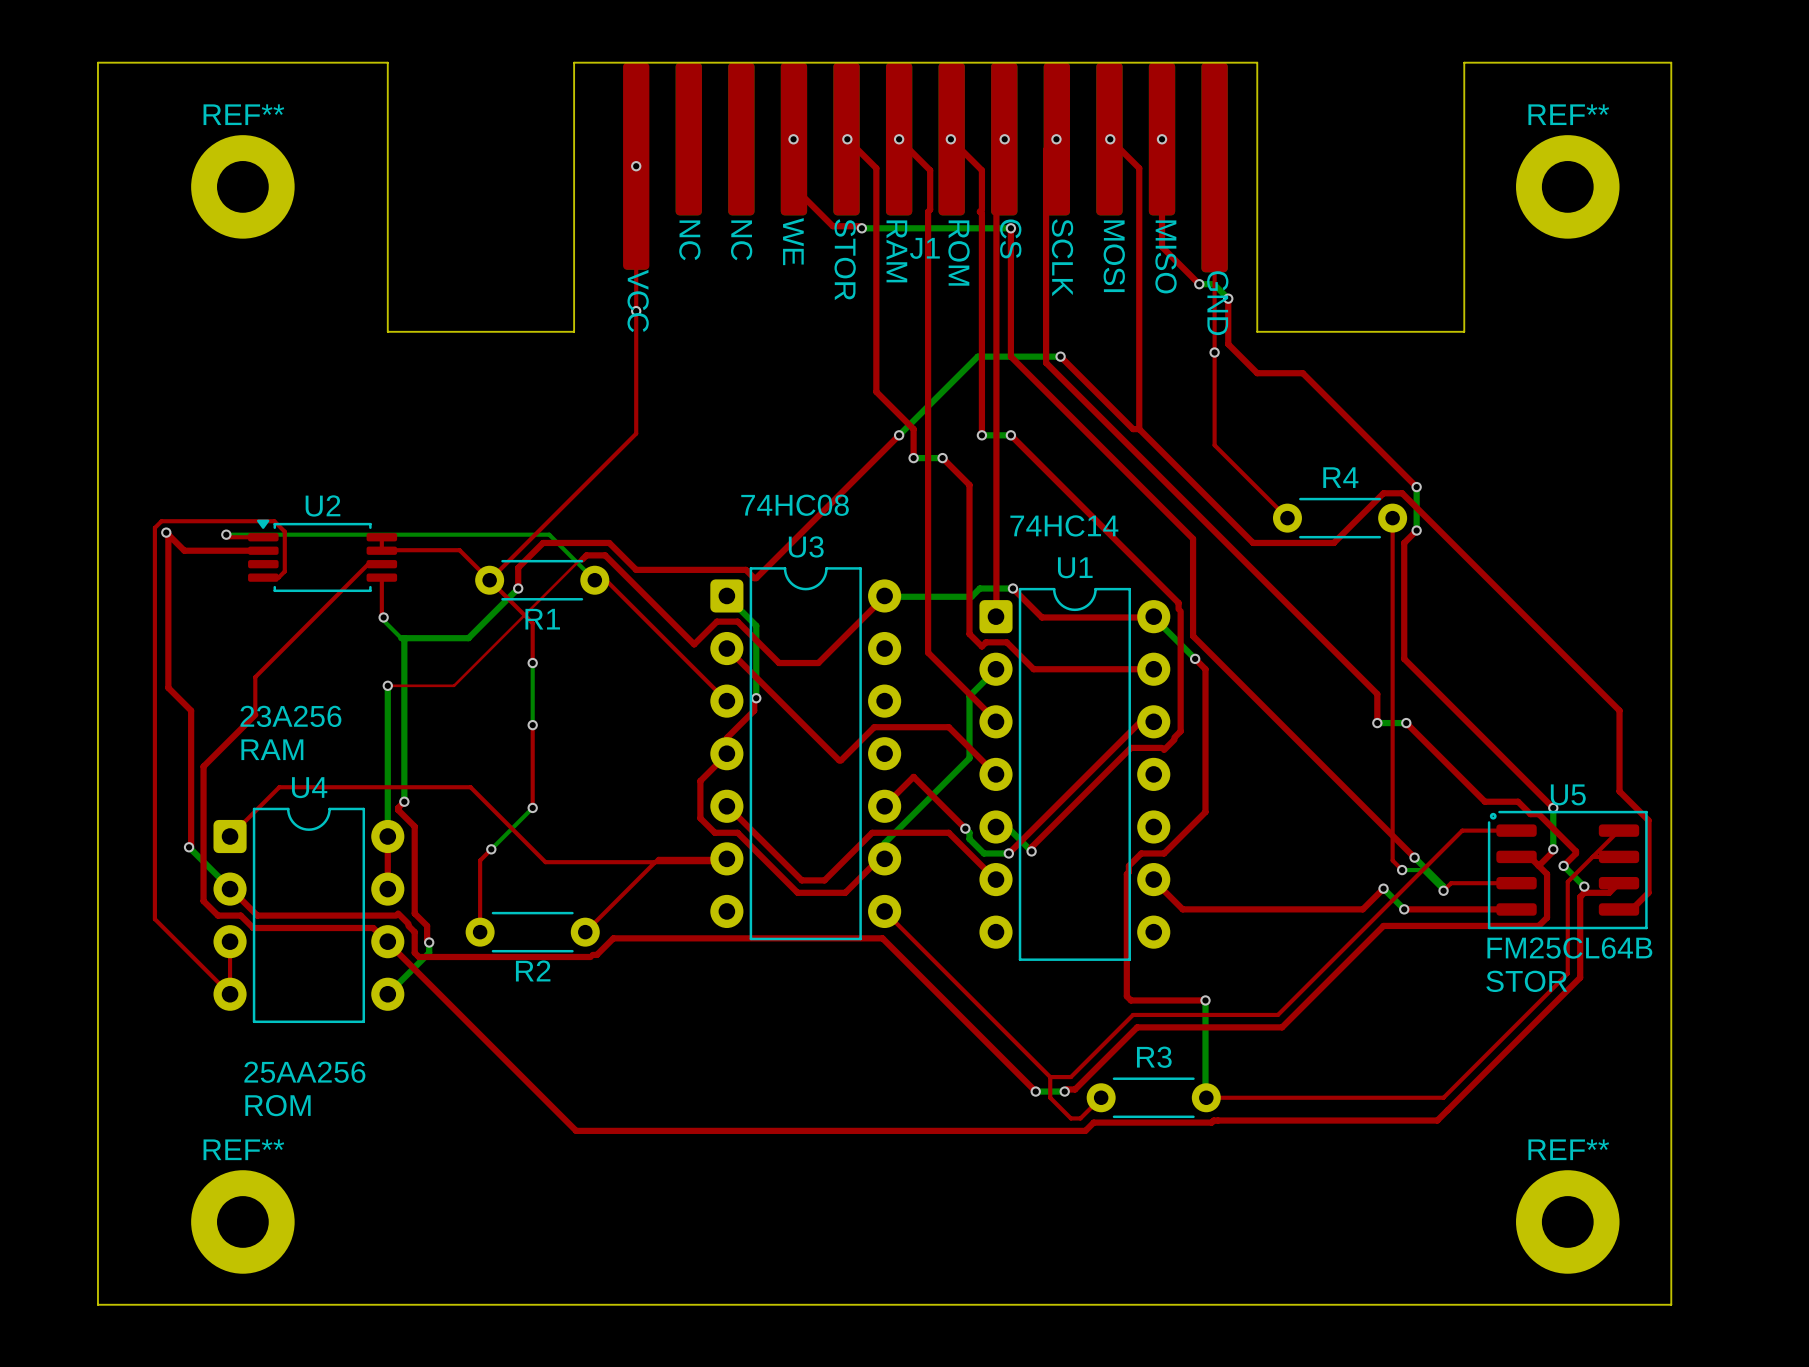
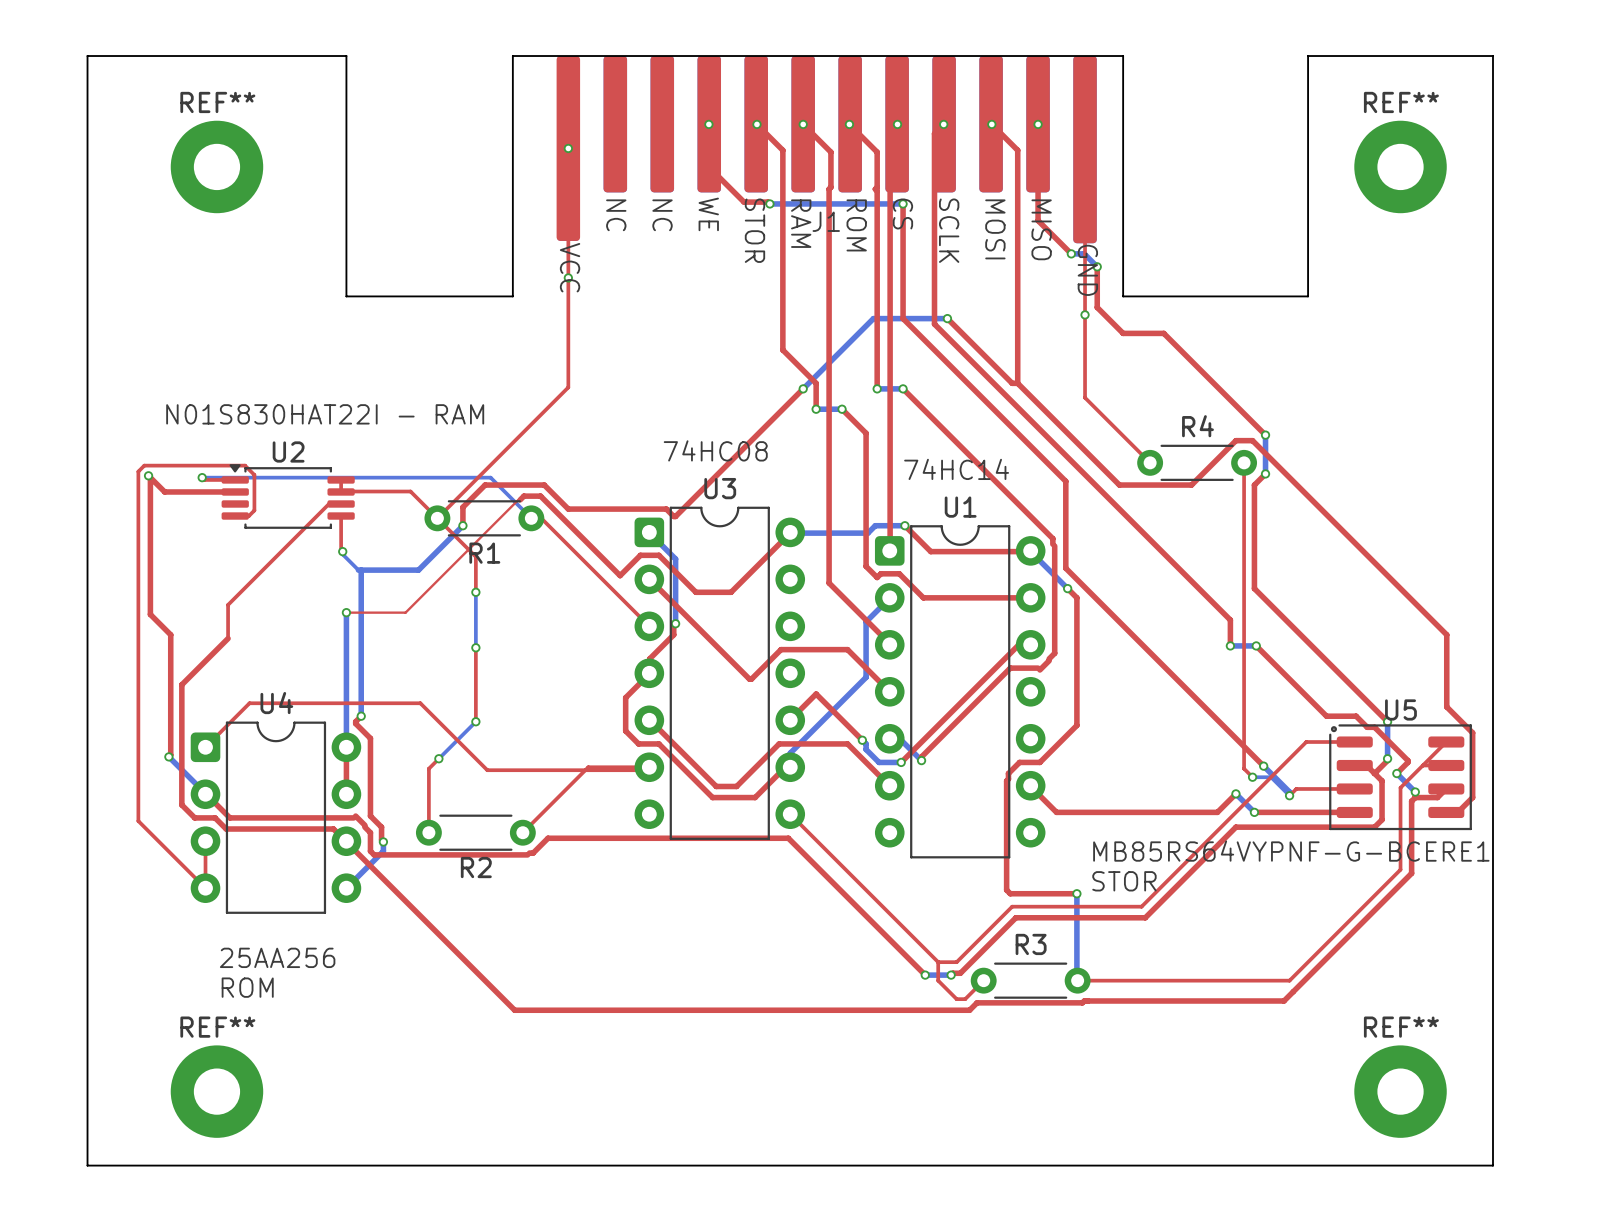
text: none -> N01S830HAT22I - RAM (325, 414)
text: 23A256 (290, 716) -> none
text: RAM (272, 749) -> none
text: FM25CL64B (1569, 948) -> none
text: none -> MB85RS64VYPNF-G-BCERE1 (1291, 851)
text position: STOR (1526, 981) -> STOR (1124, 881)

